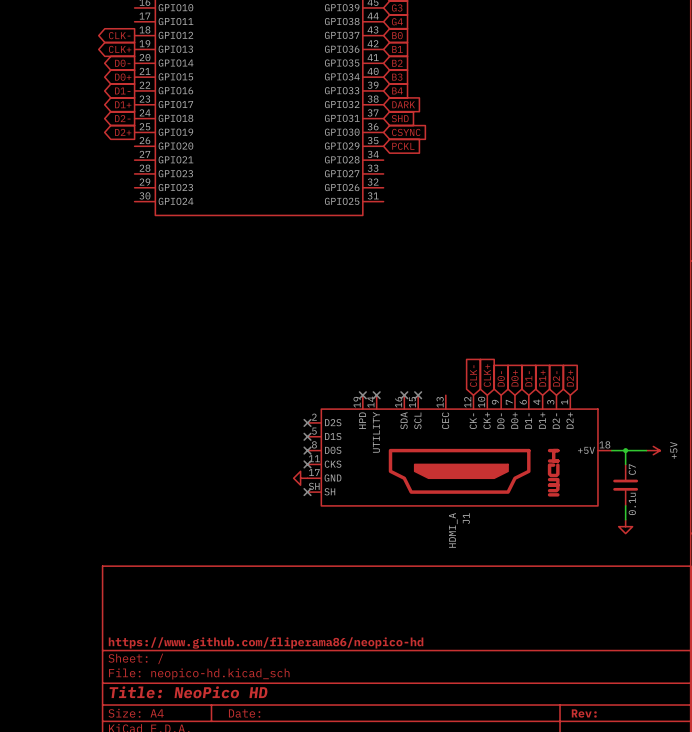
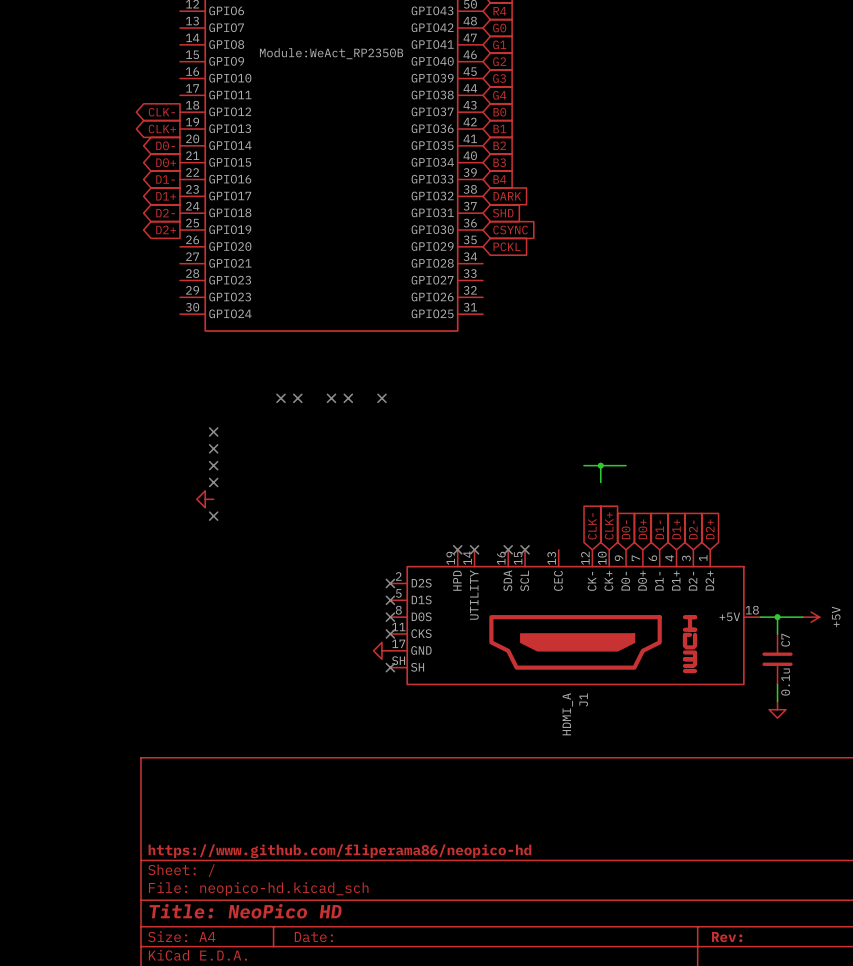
no-connect mark: none -> (280, 398)
no-connect mark: none -> (297, 398)
no-connect mark: none -> (331, 398)
no-connect mark: none -> (348, 398)
no-connect mark: none -> (381, 398)
no-connect mark: none -> (213, 431)
no-connect mark: none -> (213, 448)
no-connect mark: none -> (213, 465)
wire: none -> (583, 465) (626, 465)
wire: none -> (600, 465) (600, 482)
junction: none -> (600, 465)
no-connect mark: none -> (213, 482)
power symbol: none -> (205, 499)
no-connect mark: none -> (213, 516)

